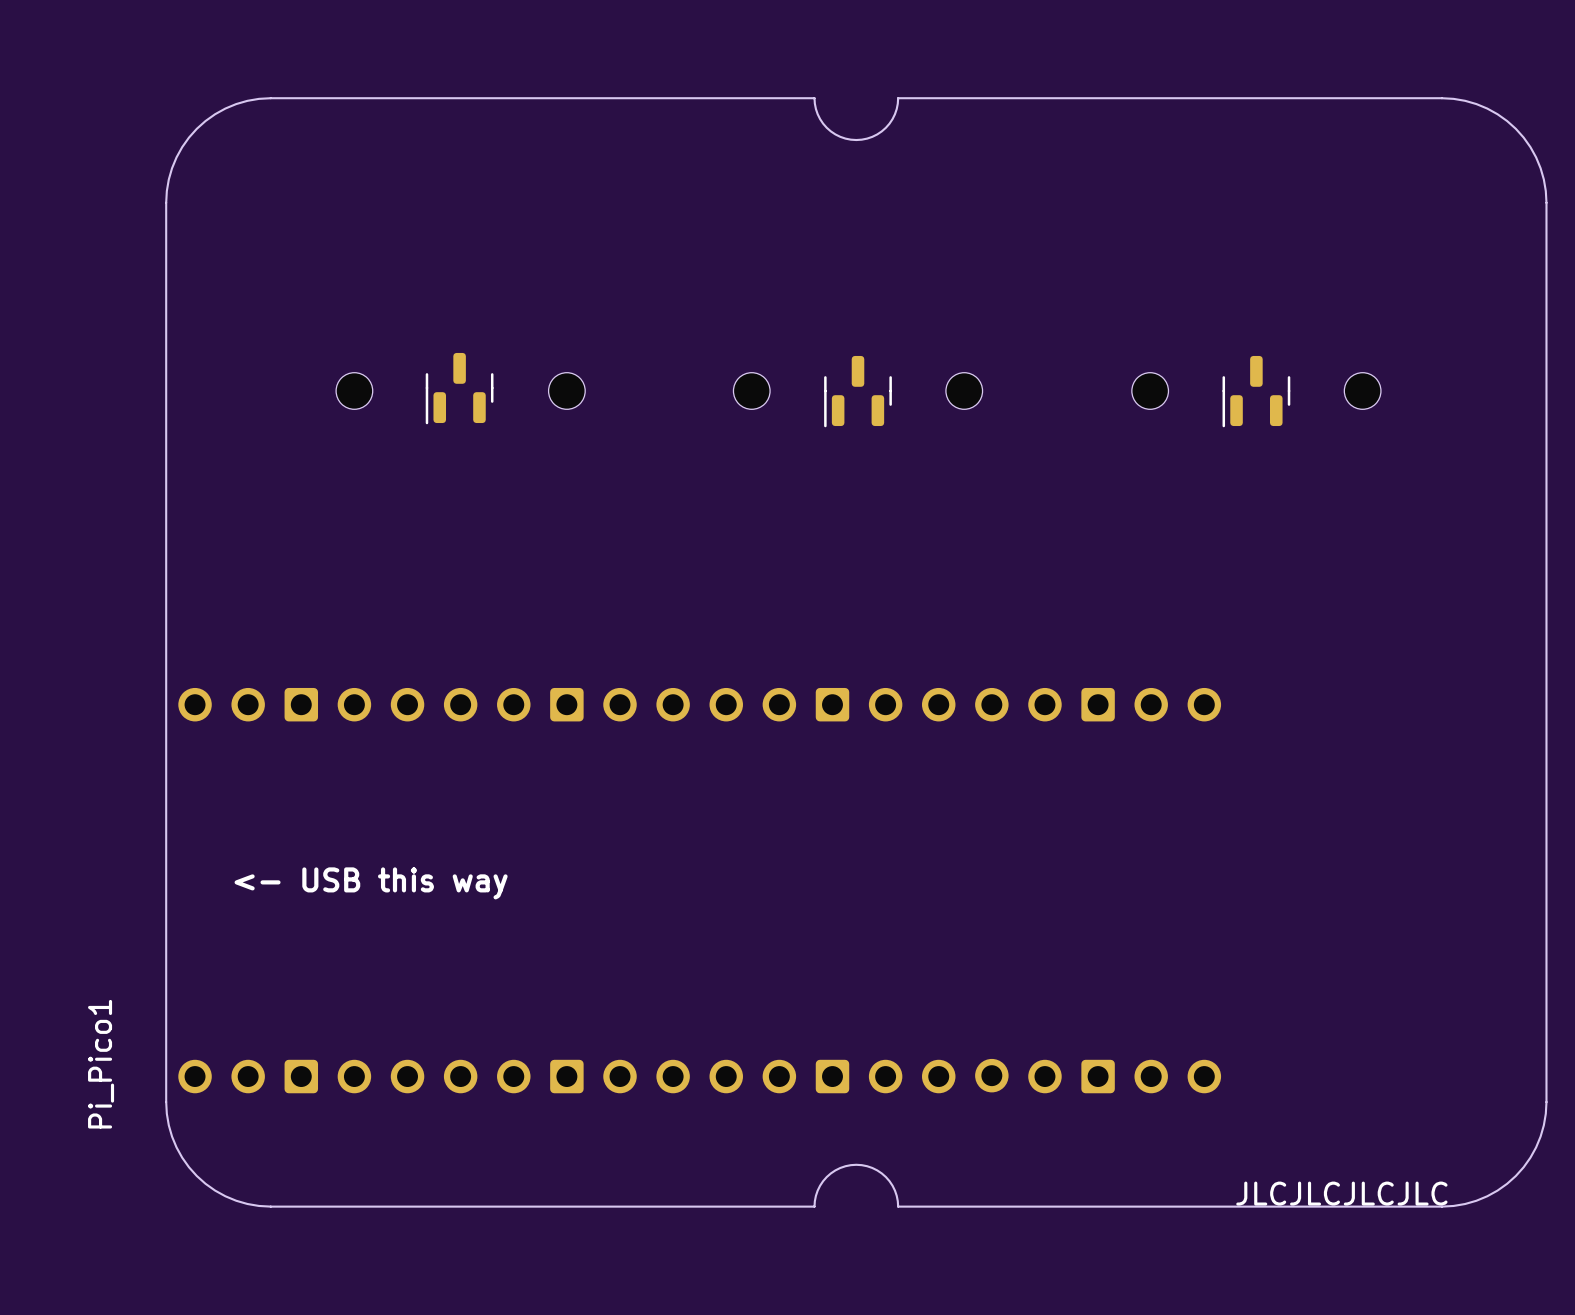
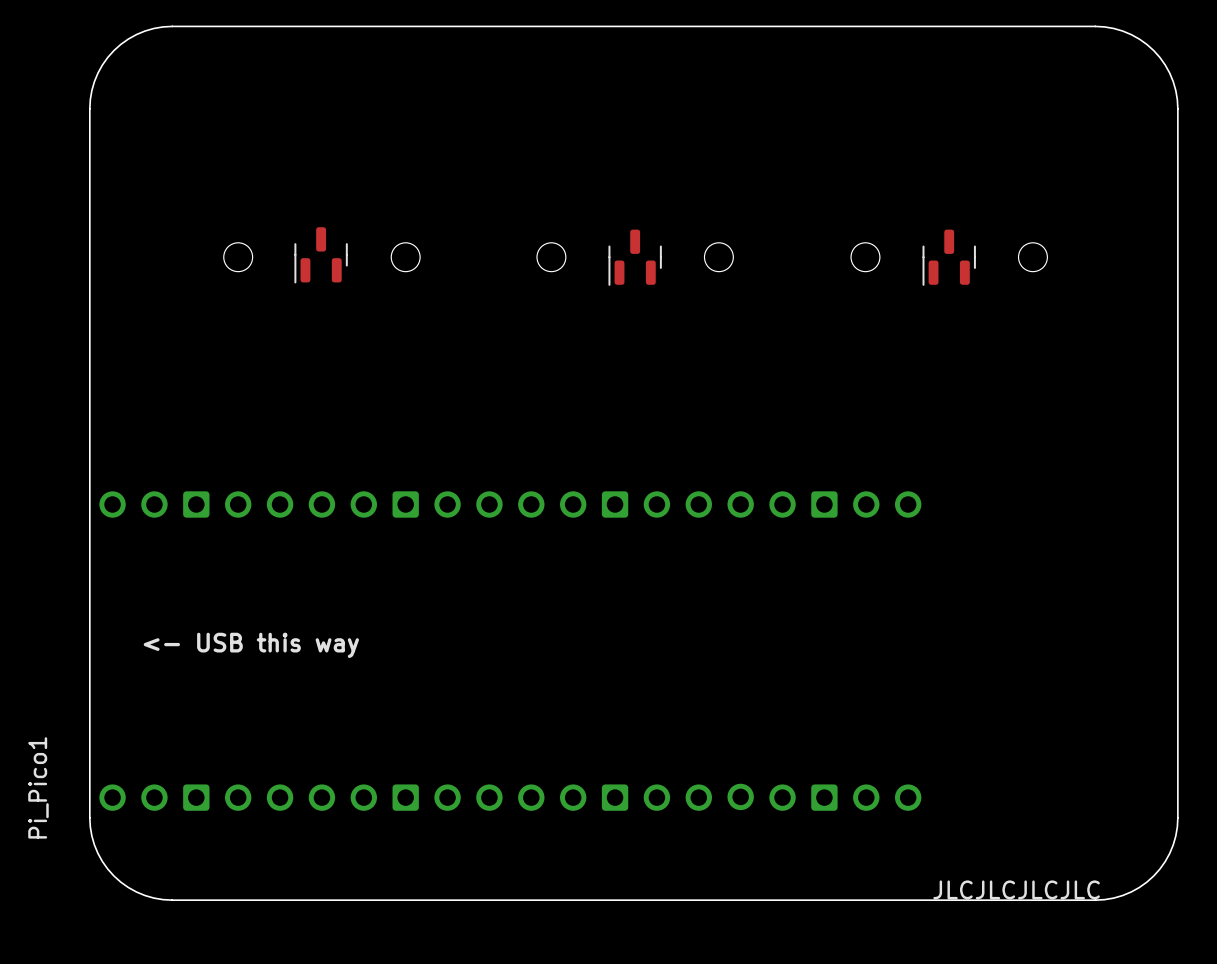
board edge: (814, 98) (817, 114) (826, 127) (840, 136) (856, 140) (872, 136) (885, 127) (894, 114) (898, 98) -> (600, 26) (666, 26)
board edge: (814, 1206) (817, 1190) (826, 1177) (840, 1167) (856, 1164) (872, 1167) (885, 1177) (894, 1190) (898, 1206) -> (600, 900) (666, 900)

